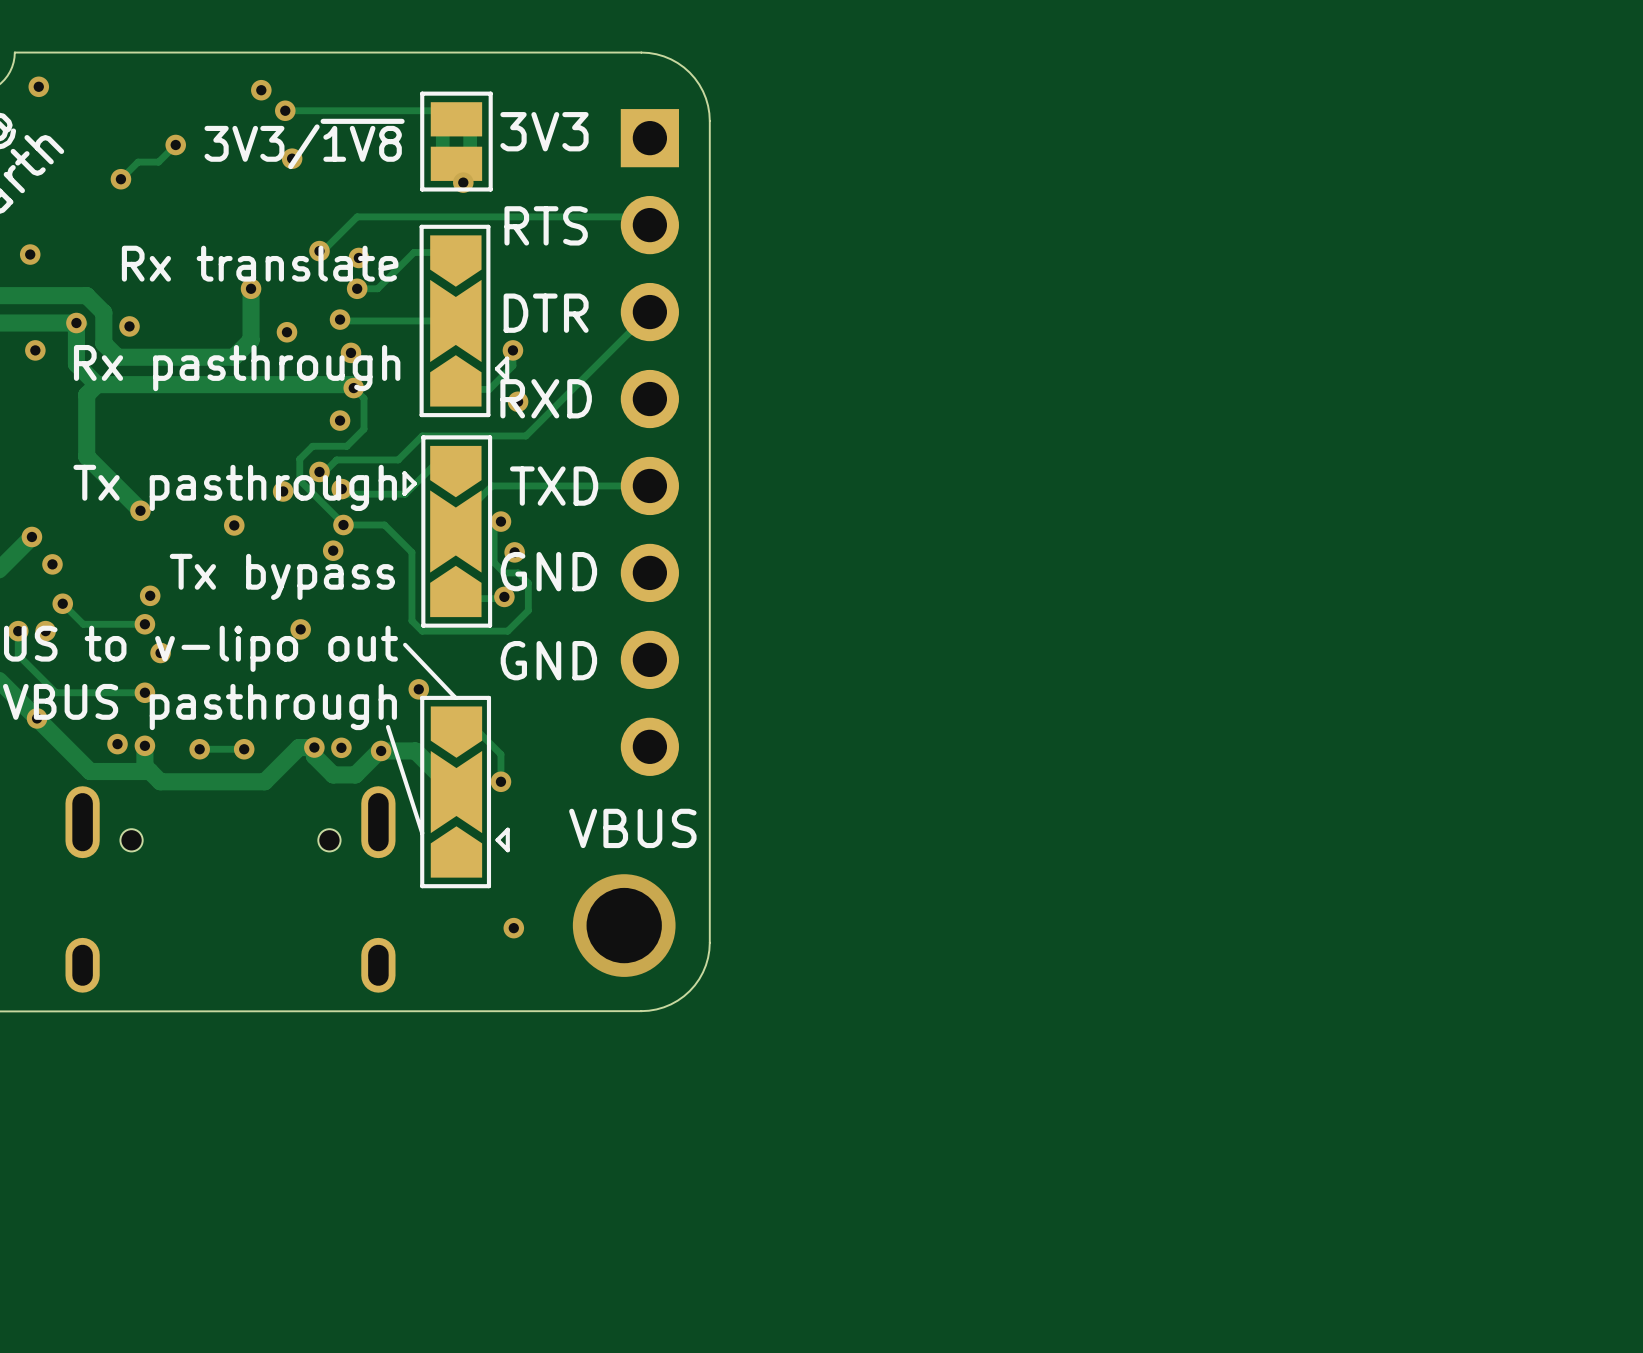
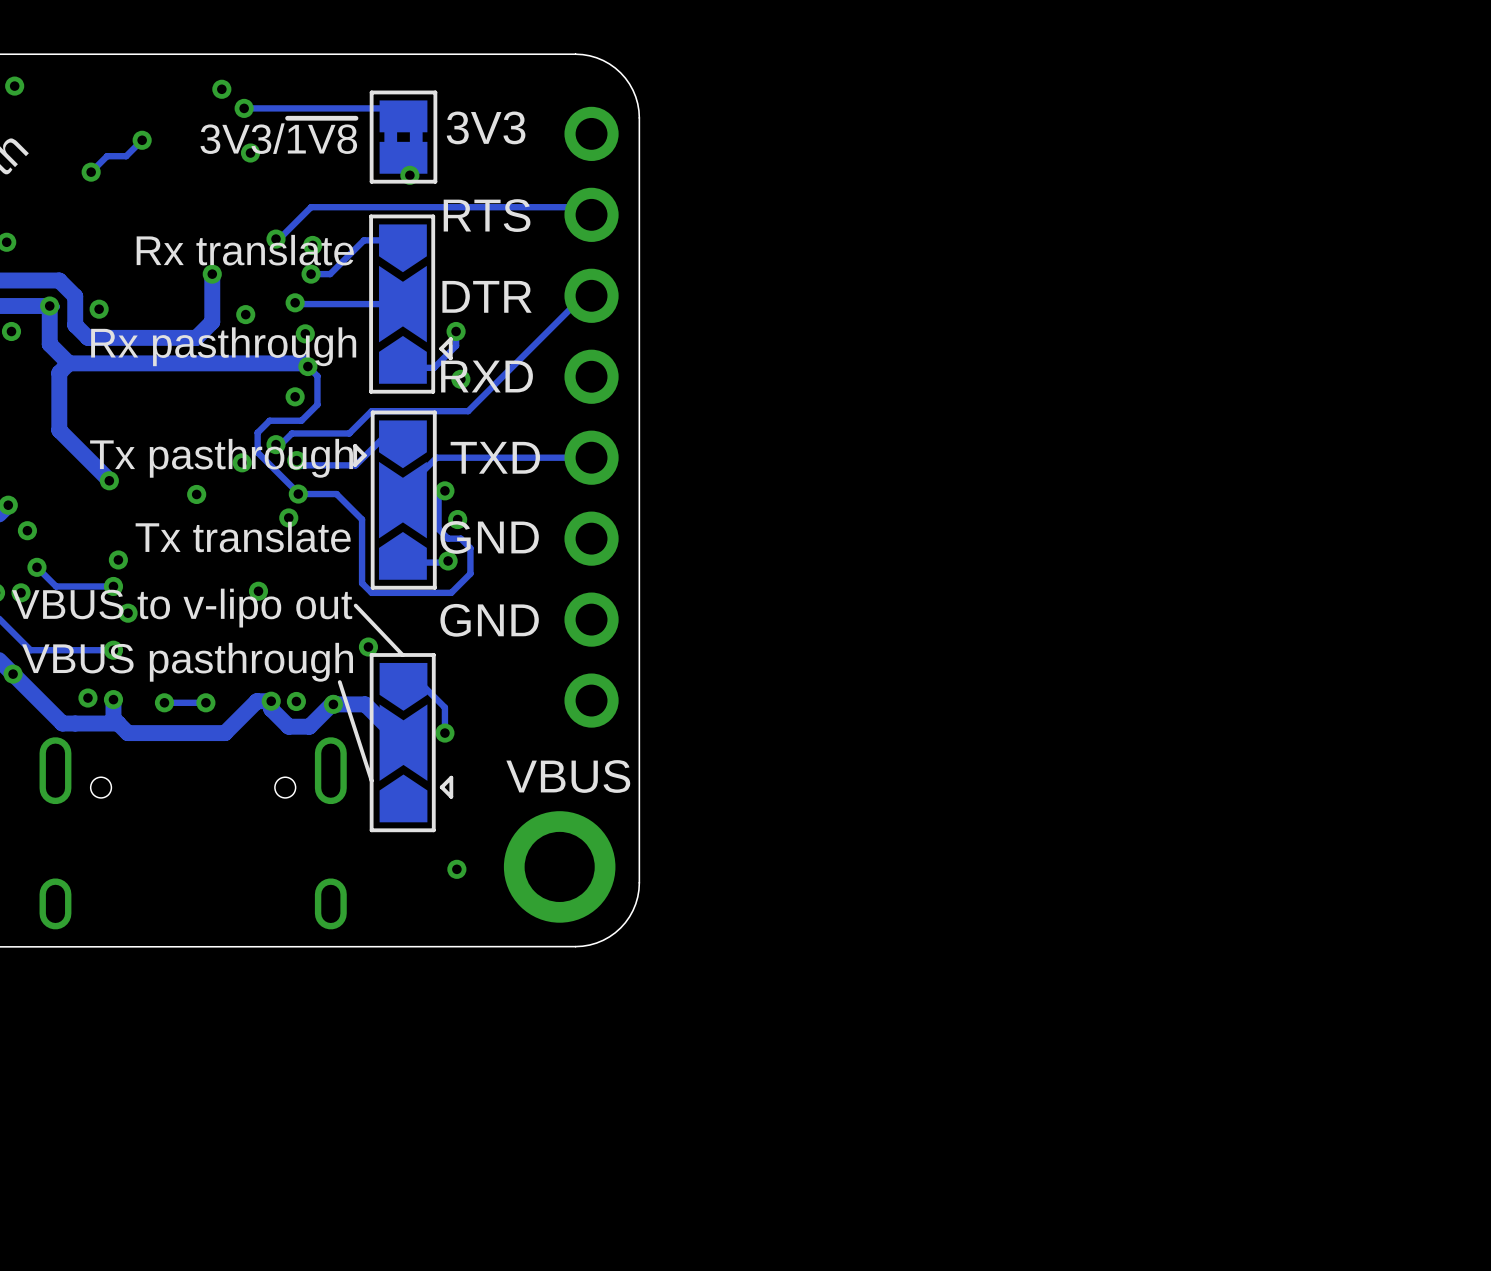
part footprint: [620, 109, 679, 776] -> [564, 106, 619, 728]
text: Tx bypass (282, 576) -> Tx translate (243, 537)
part: none -> (559, 866)
via: (624, 925) -> none

